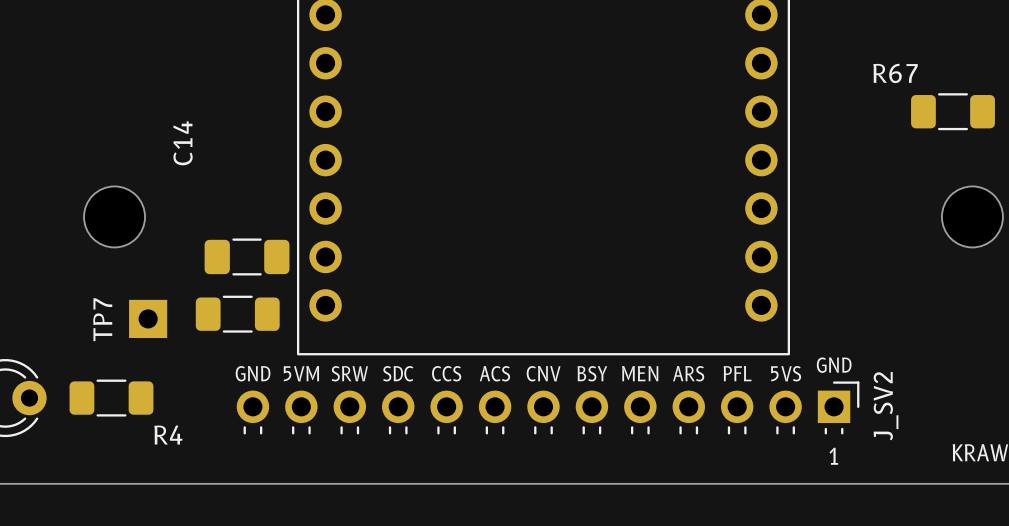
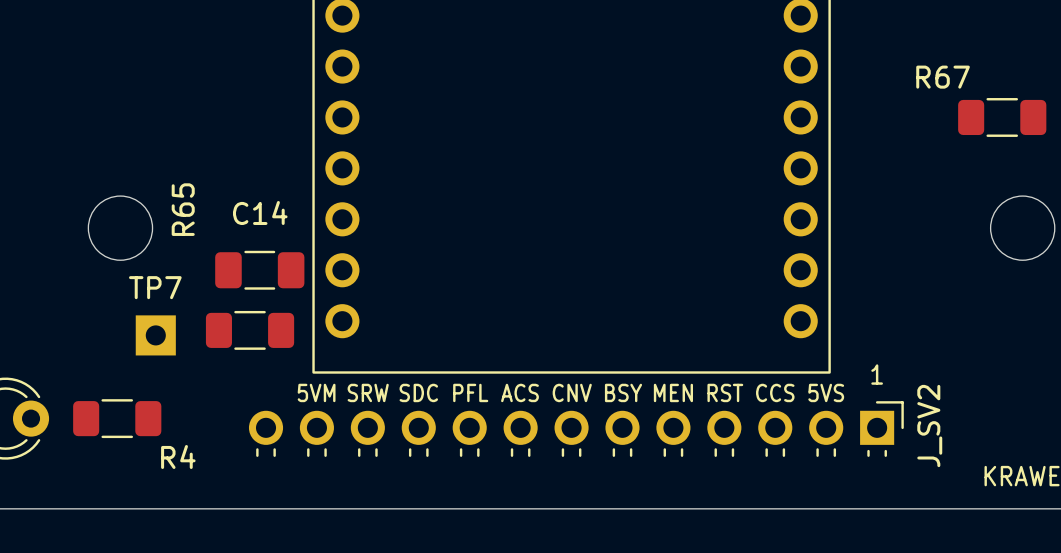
C14 name rotation: 0° (183, 143) -> 90° clockwise (260, 212)
C14 name position: C14 (183, 143) -> C14 (260, 212)
R65 name: none -> R65 (183, 209)
TP7 name rotation: 0° (102, 319) -> 90° clockwise (155, 287)
text: GND (834, 365) -> 1 (877, 374)
text: GND (253, 373) -> none
text: CCS (446, 373) -> PFL (470, 392)
text: ARS (688, 373) -> RST (725, 392)
text: PFL (737, 373) -> CCS (775, 392)
text: 1 (833, 456) -> none

